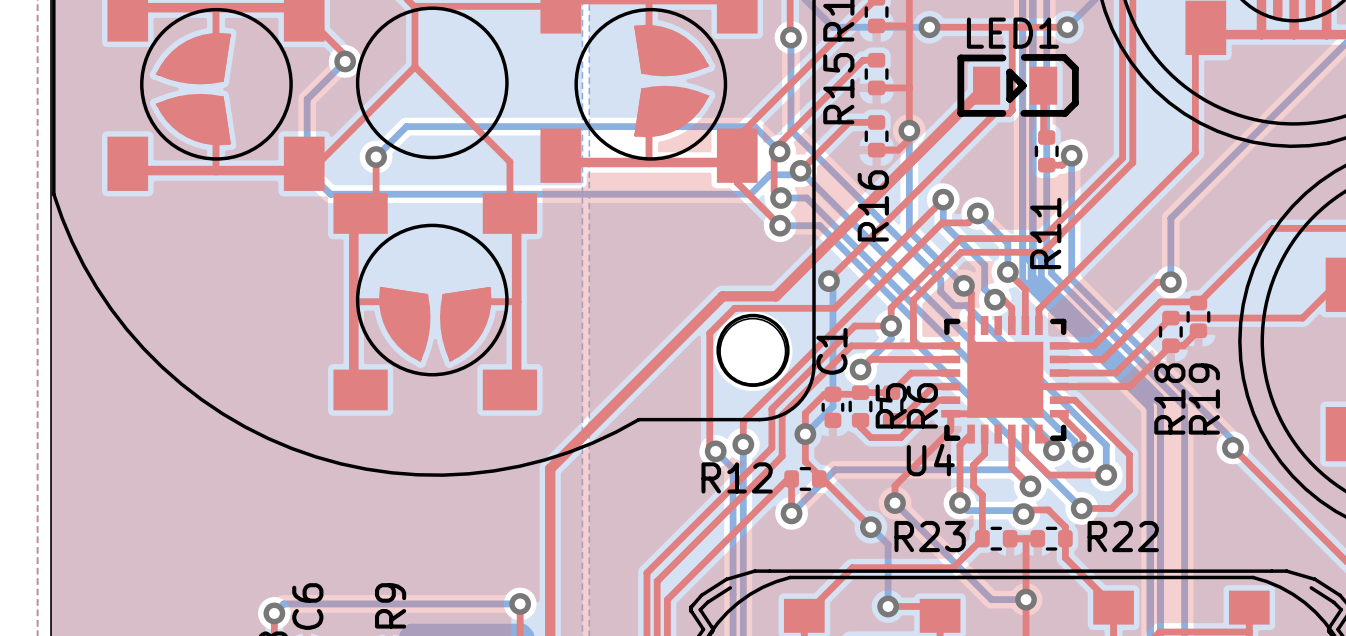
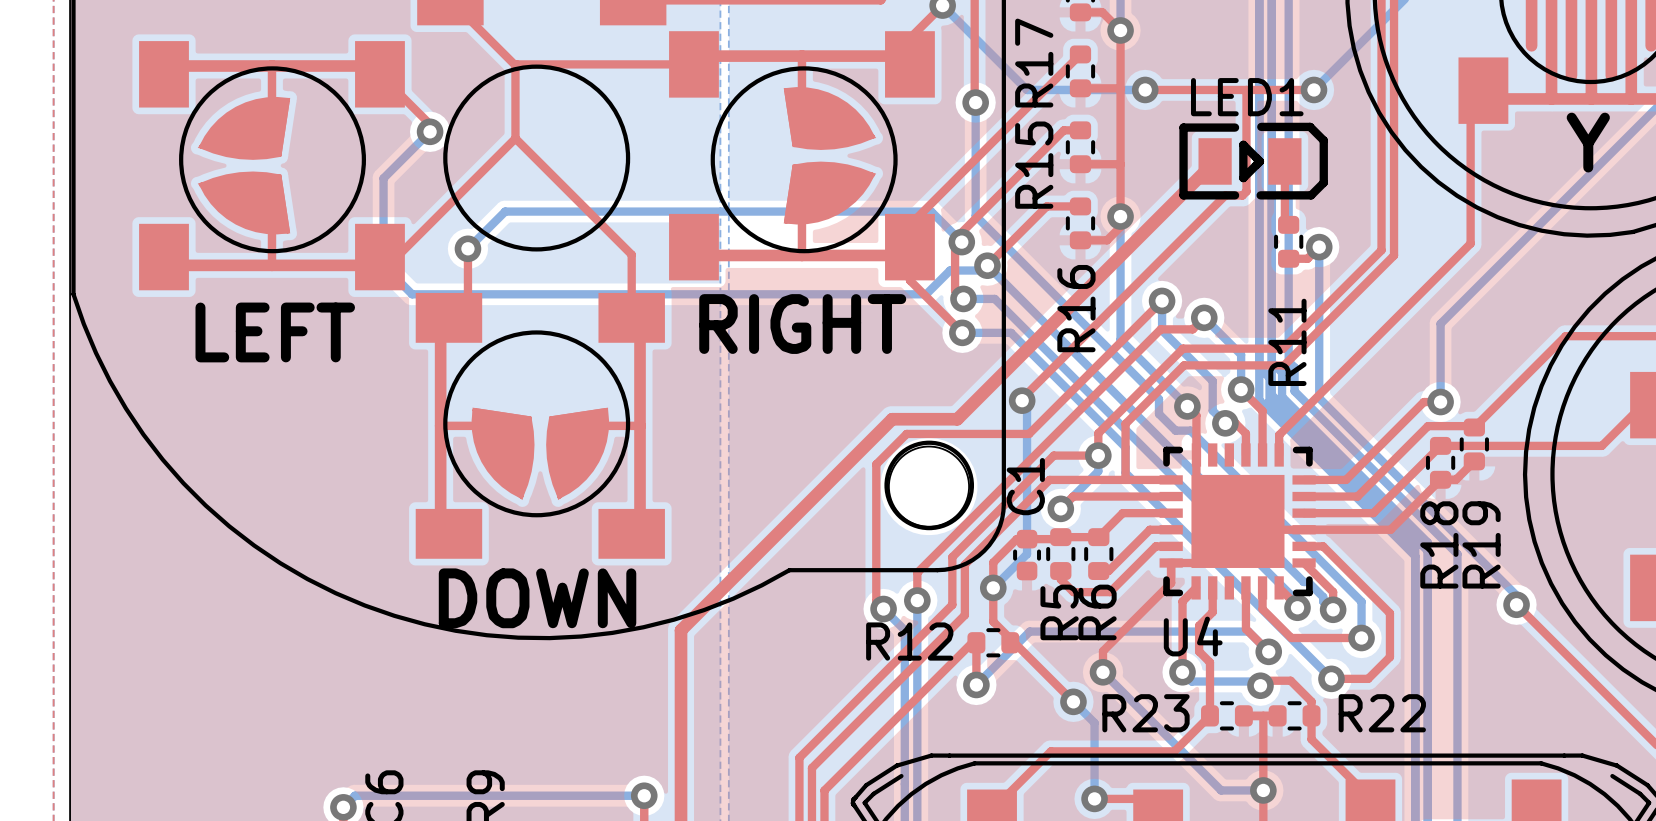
text: none -> Y (1588, 142)
text: none -> RIGHT (802, 324)
text: none -> LEFT (275, 332)
R5 name position: R5 (891, 405) -> R5 (1059, 612)
R6 name position: R6 (922, 405) -> R6 (1097, 612)
text: none -> DOWN (537, 598)
U4 name position: U4 (930, 460) -> U4 (1193, 636)

